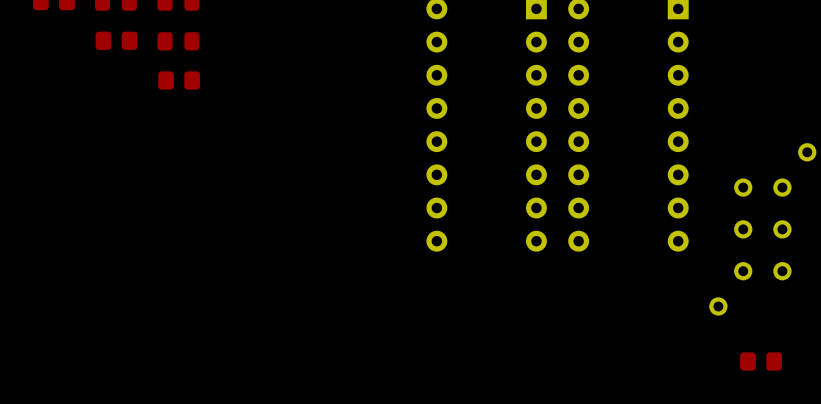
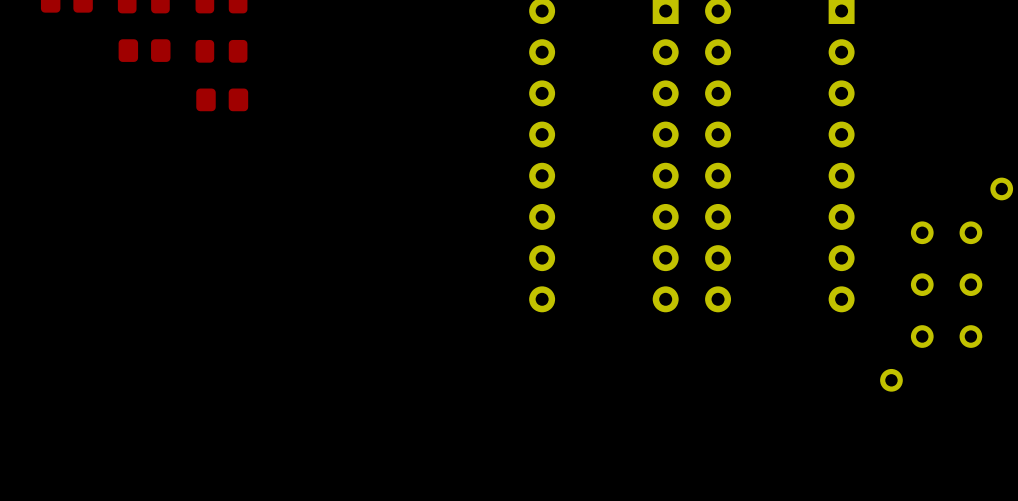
part: (761, 361) -> none

